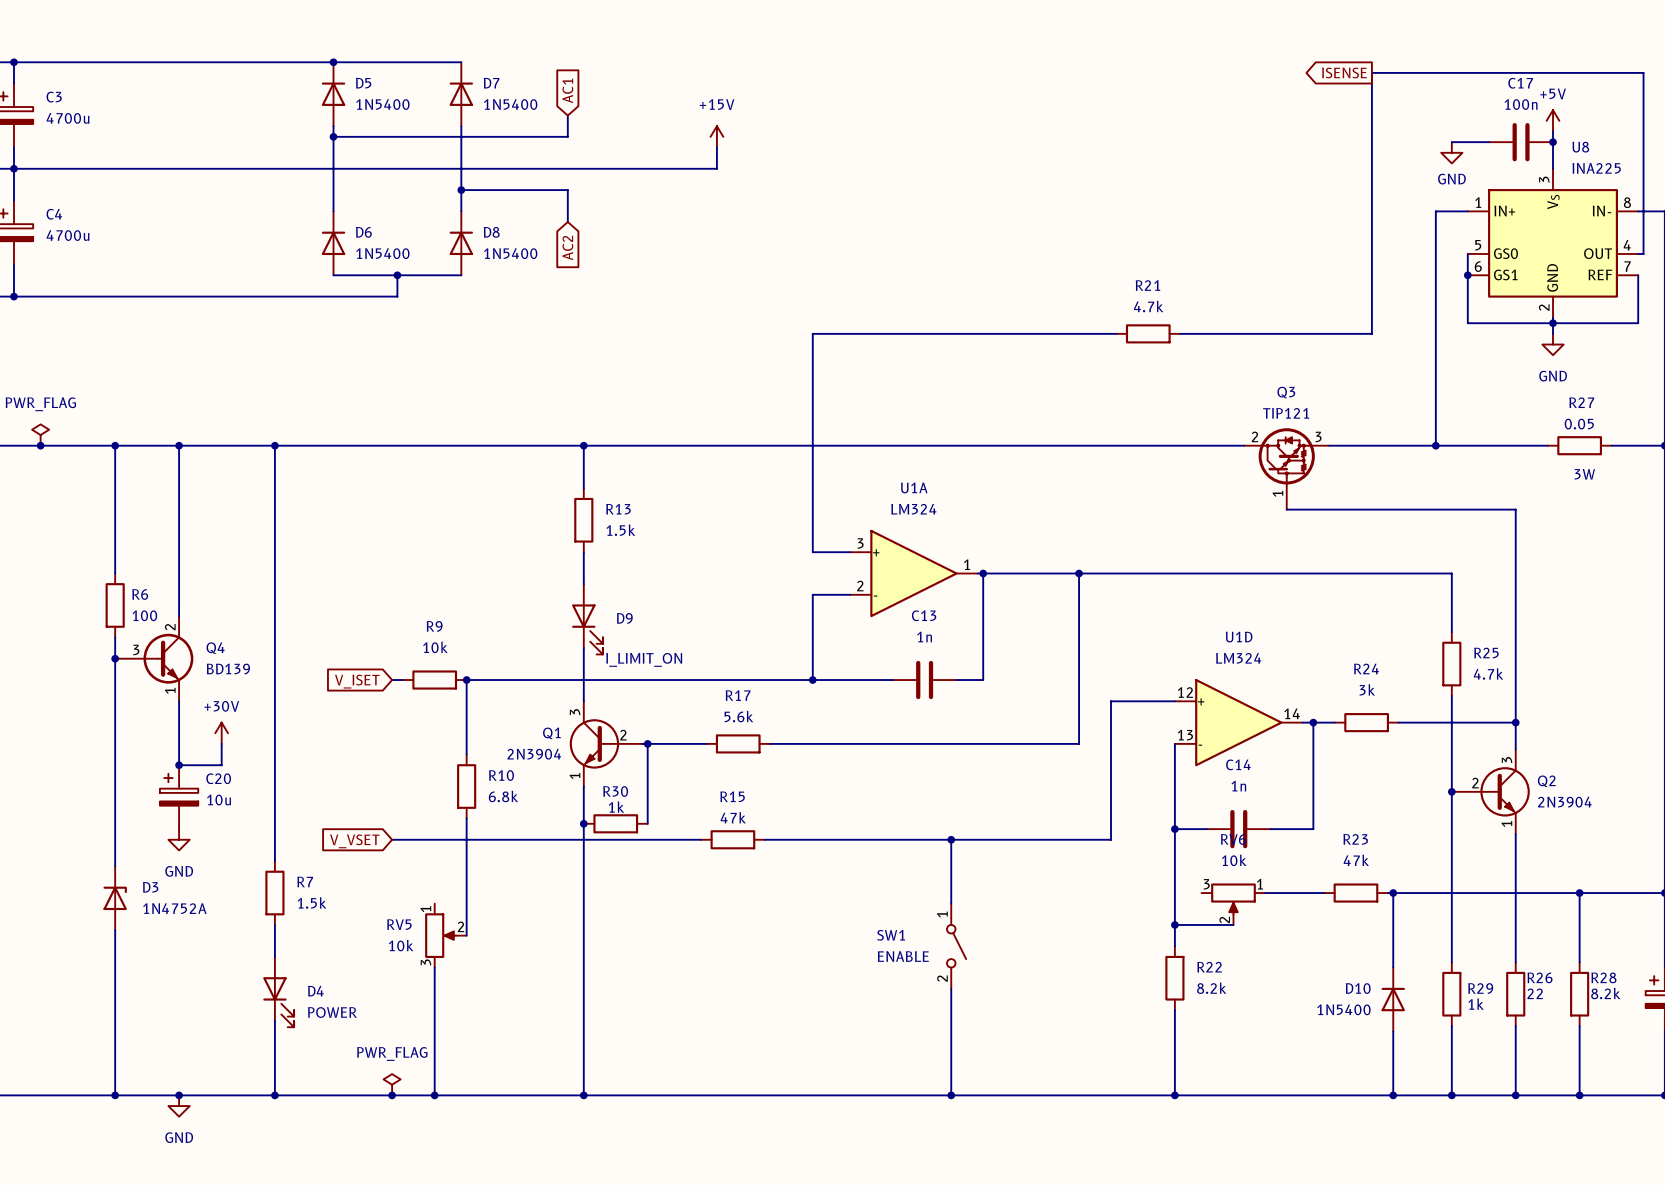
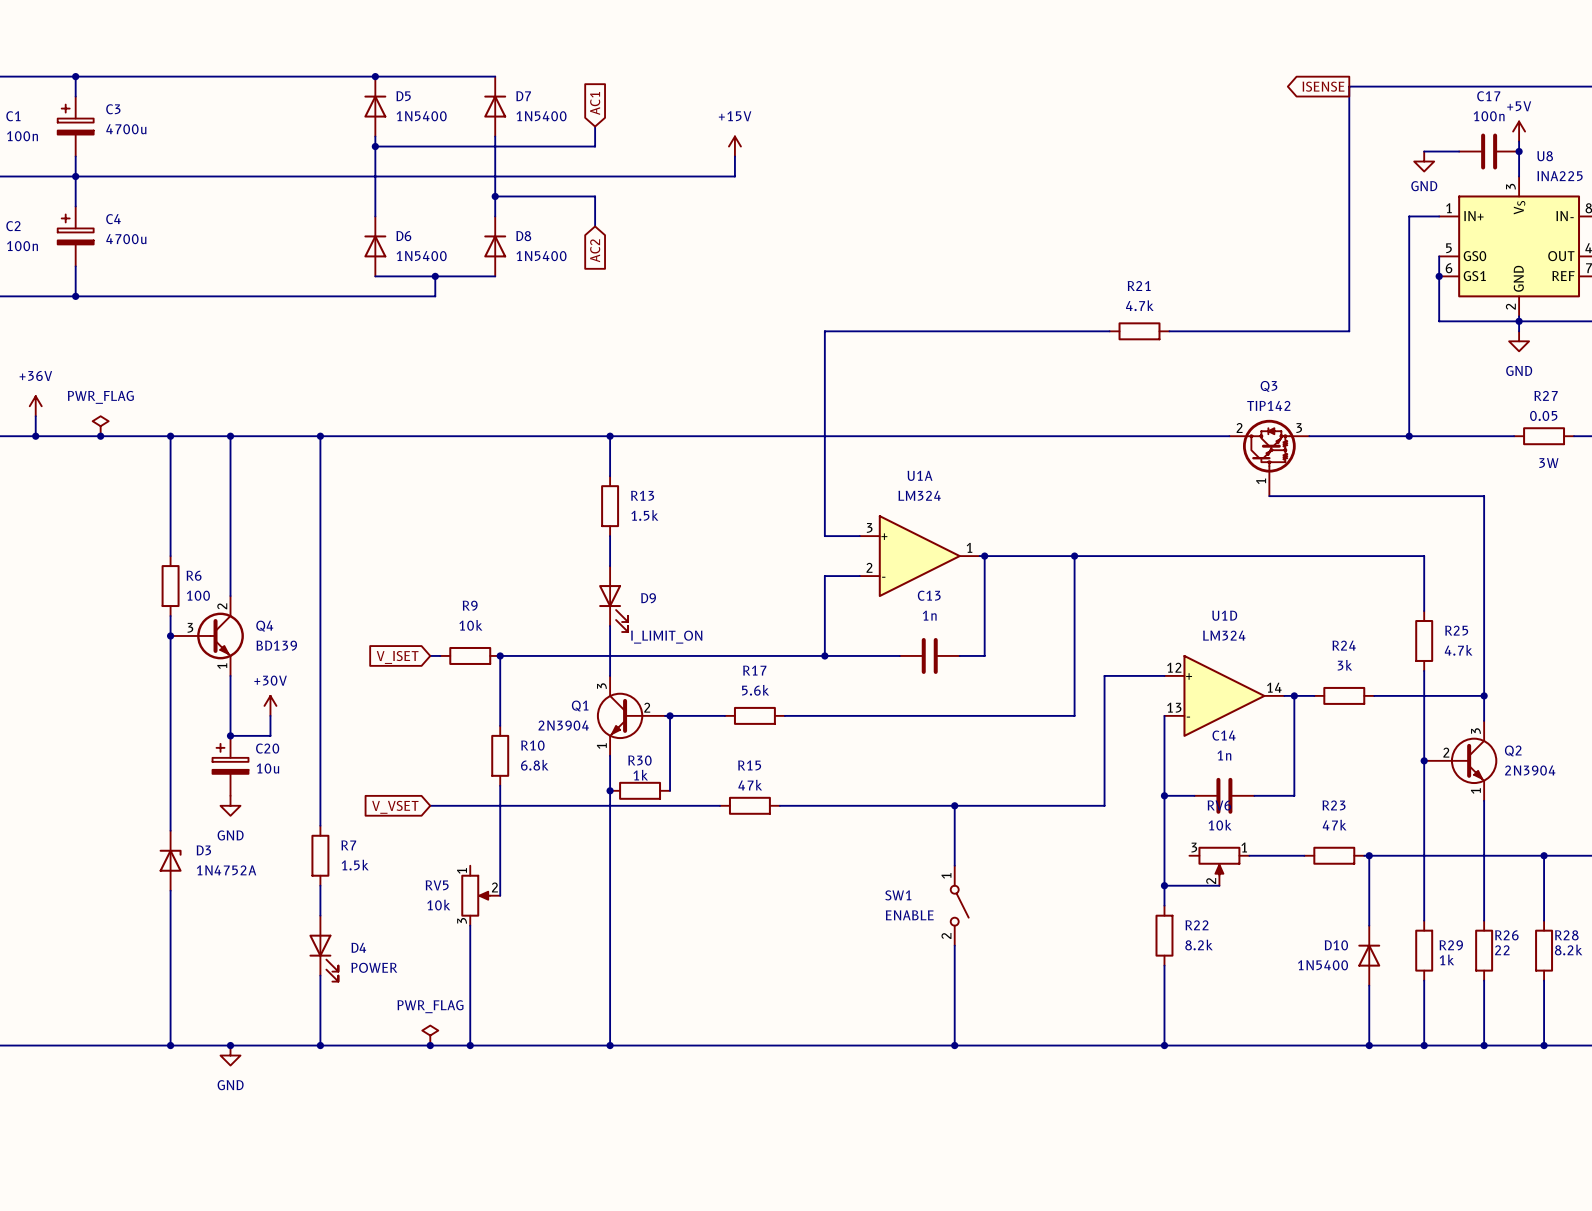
Q3 value: TIP121 (1286, 413) -> TIP142 (1268, 405)

